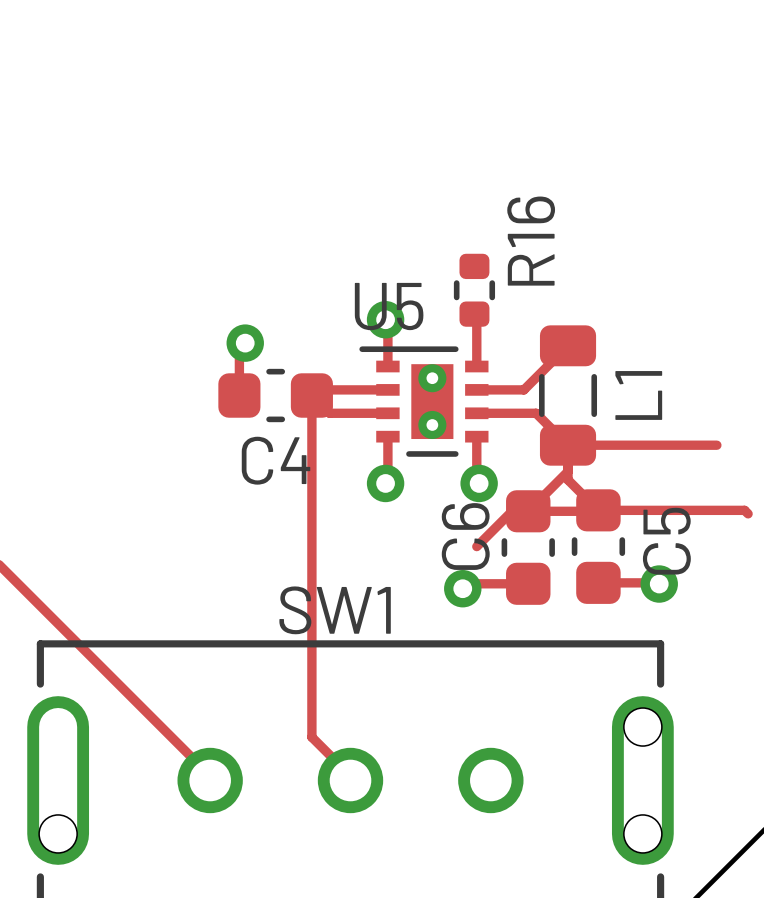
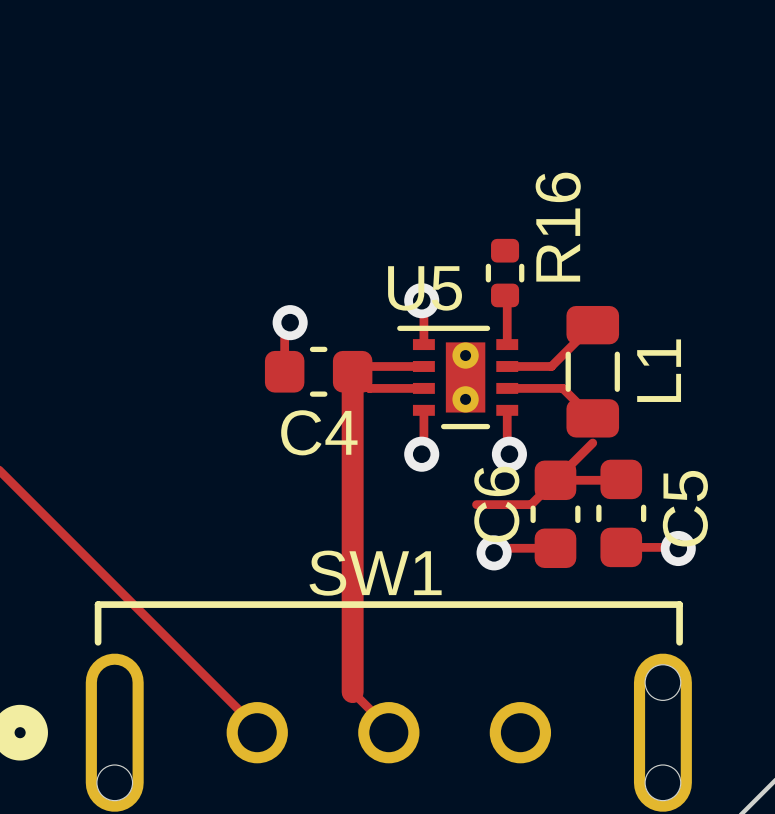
track width: thin (311, 395) (311, 737) -> thick (352, 371) (352, 692)
track: (716, 445) (568, 445) (568, 479) (598, 510) (744, 510) (748, 513) -> none
track: (512, 511) (476, 546) -> none
track: none -> (555, 480) (531, 504) (476, 504)

